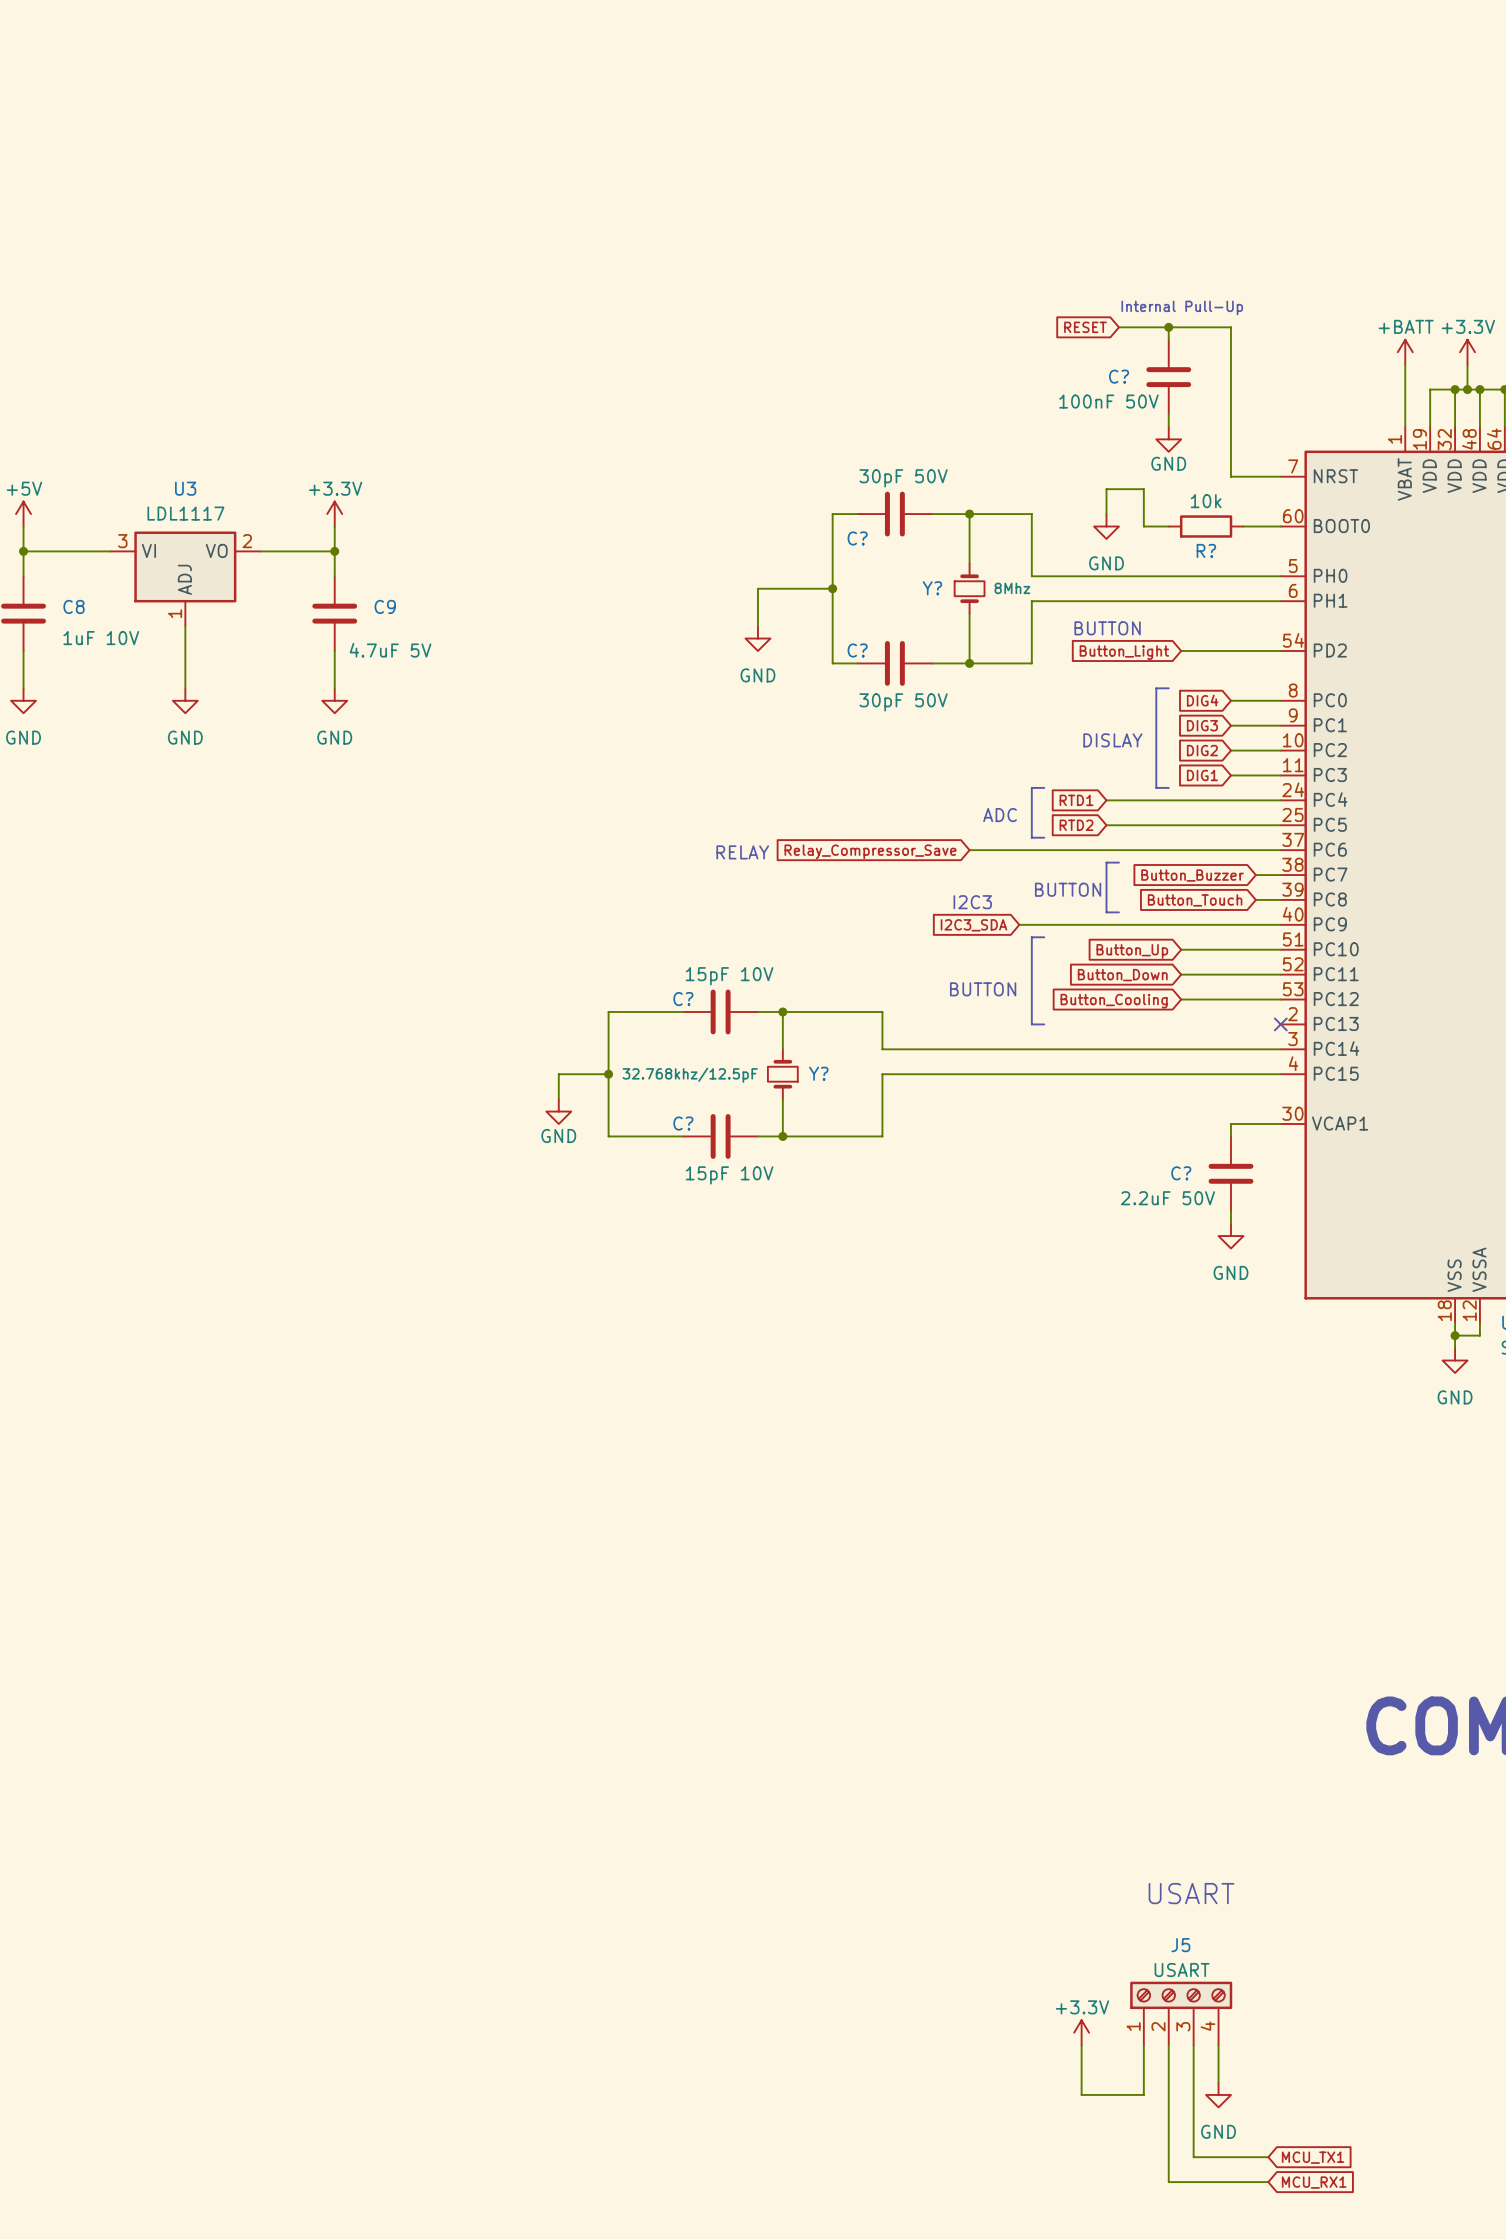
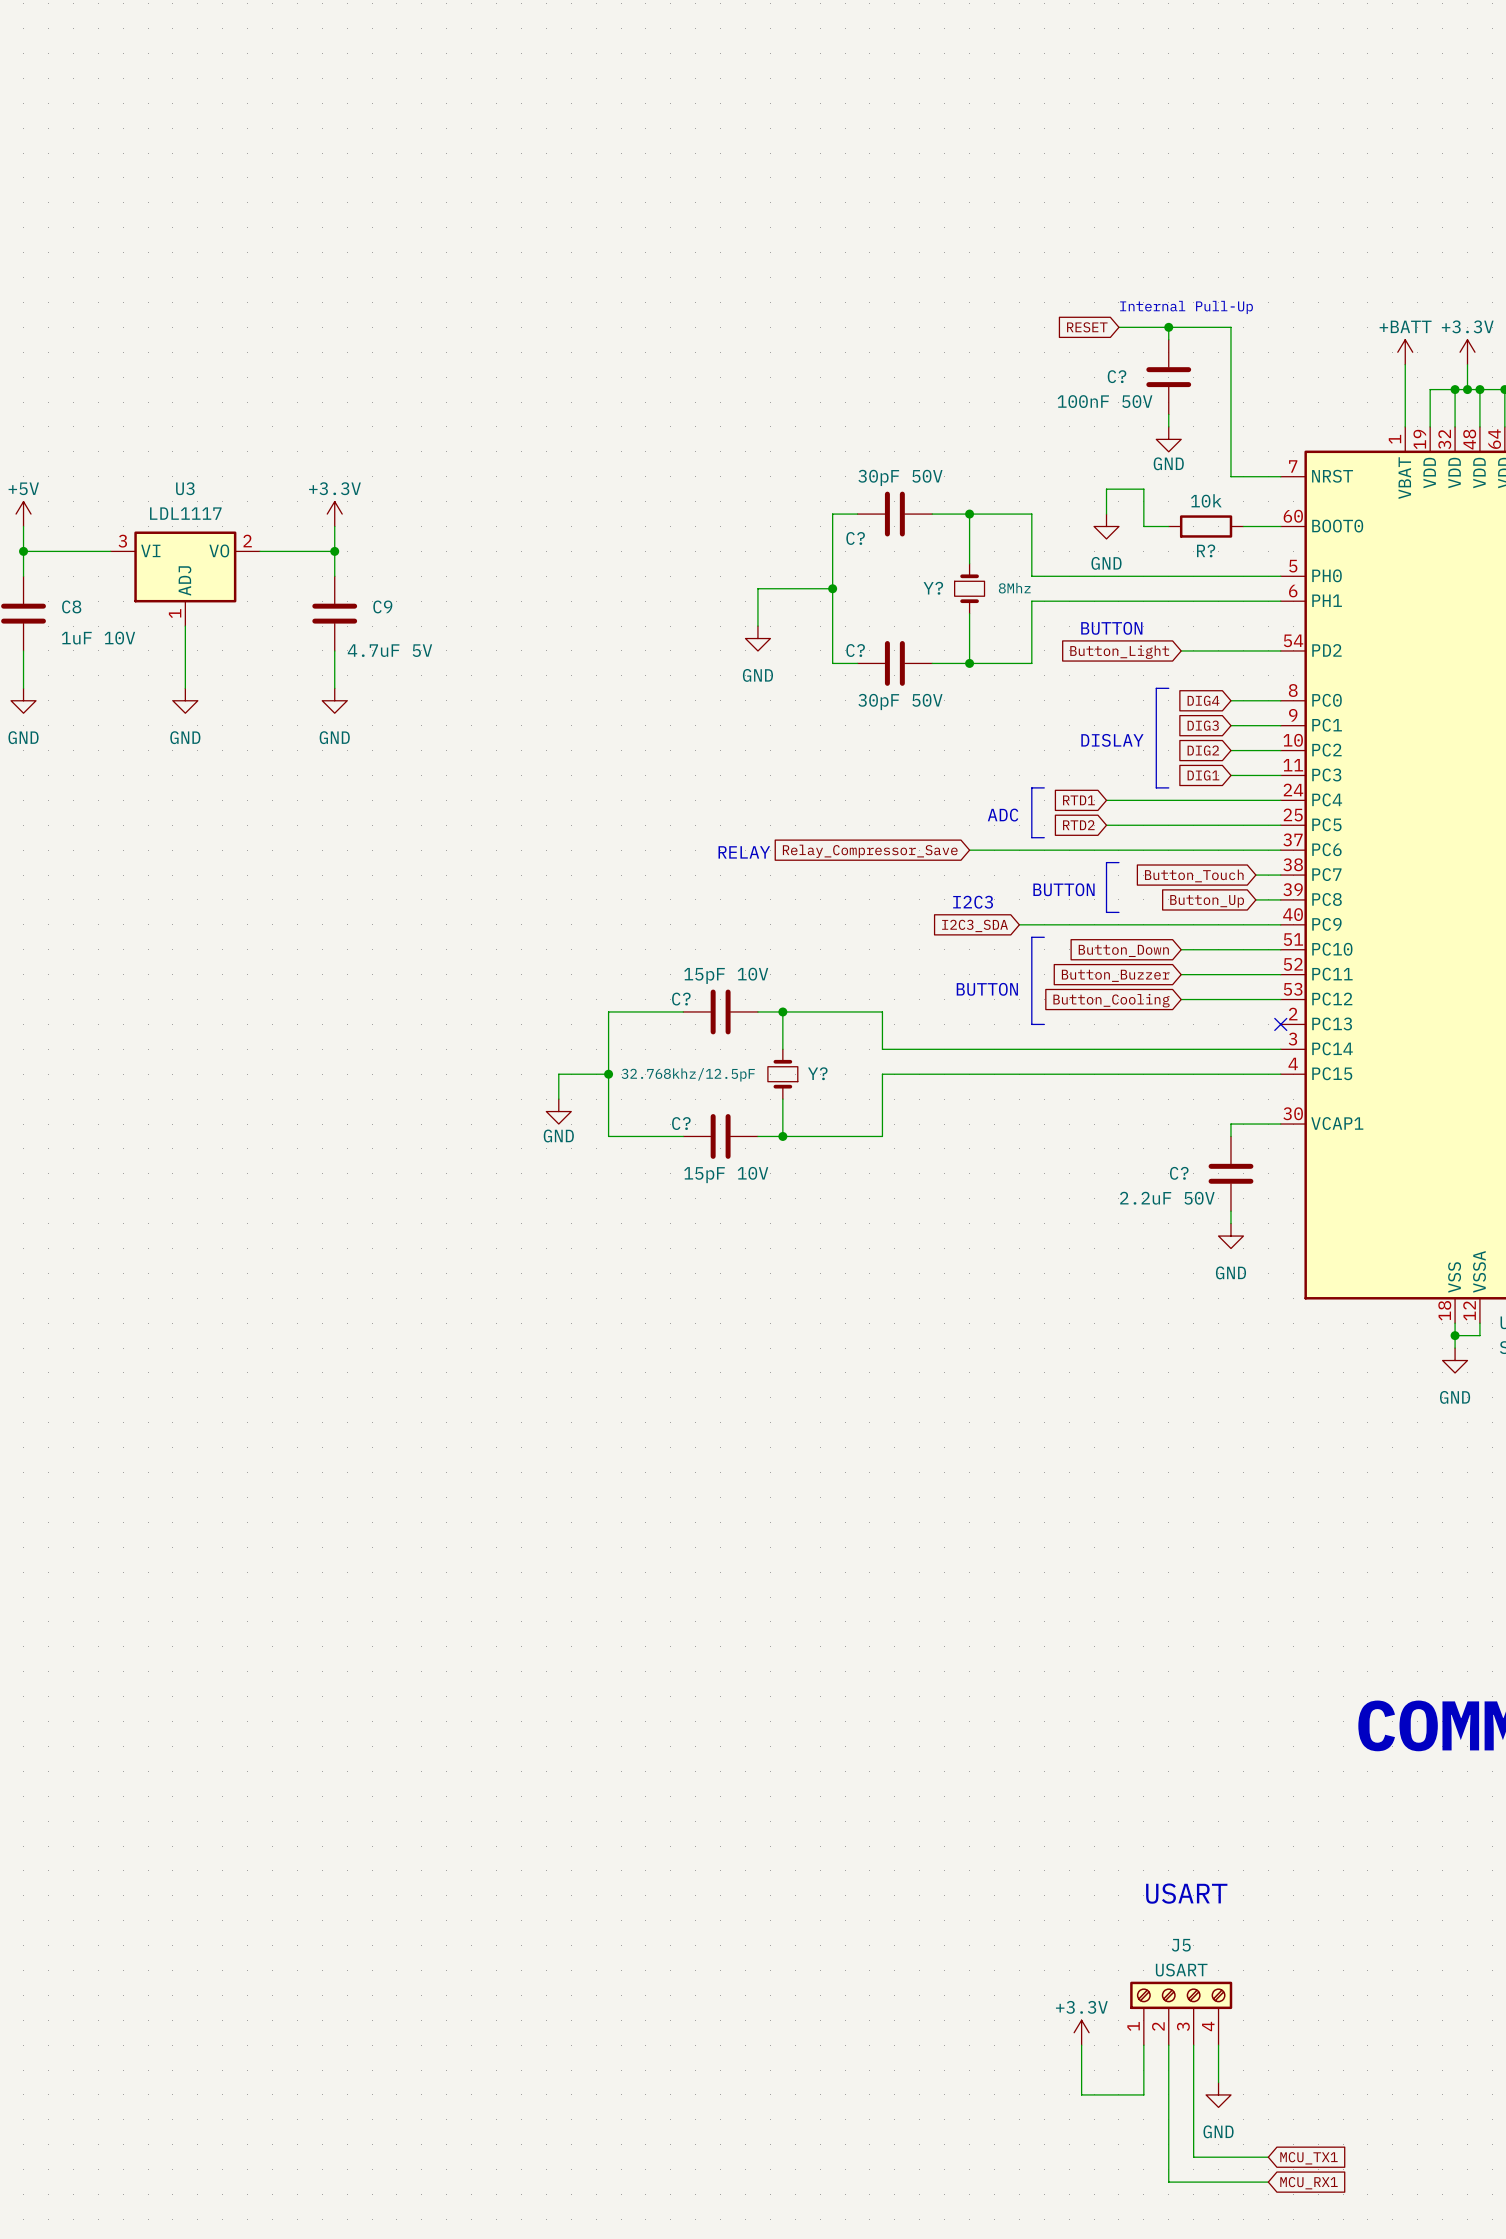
global label: Button_Buzzer (1192, 875) -> Button_Touch (1194, 875)
global label: Button_Touch (1195, 900) -> Button_Up (1207, 901)
global label: Button_Up (1132, 951) -> Button_Down (1123, 950)
global label: Button_Down (1122, 975) -> Button_Buzzer (1115, 975)

